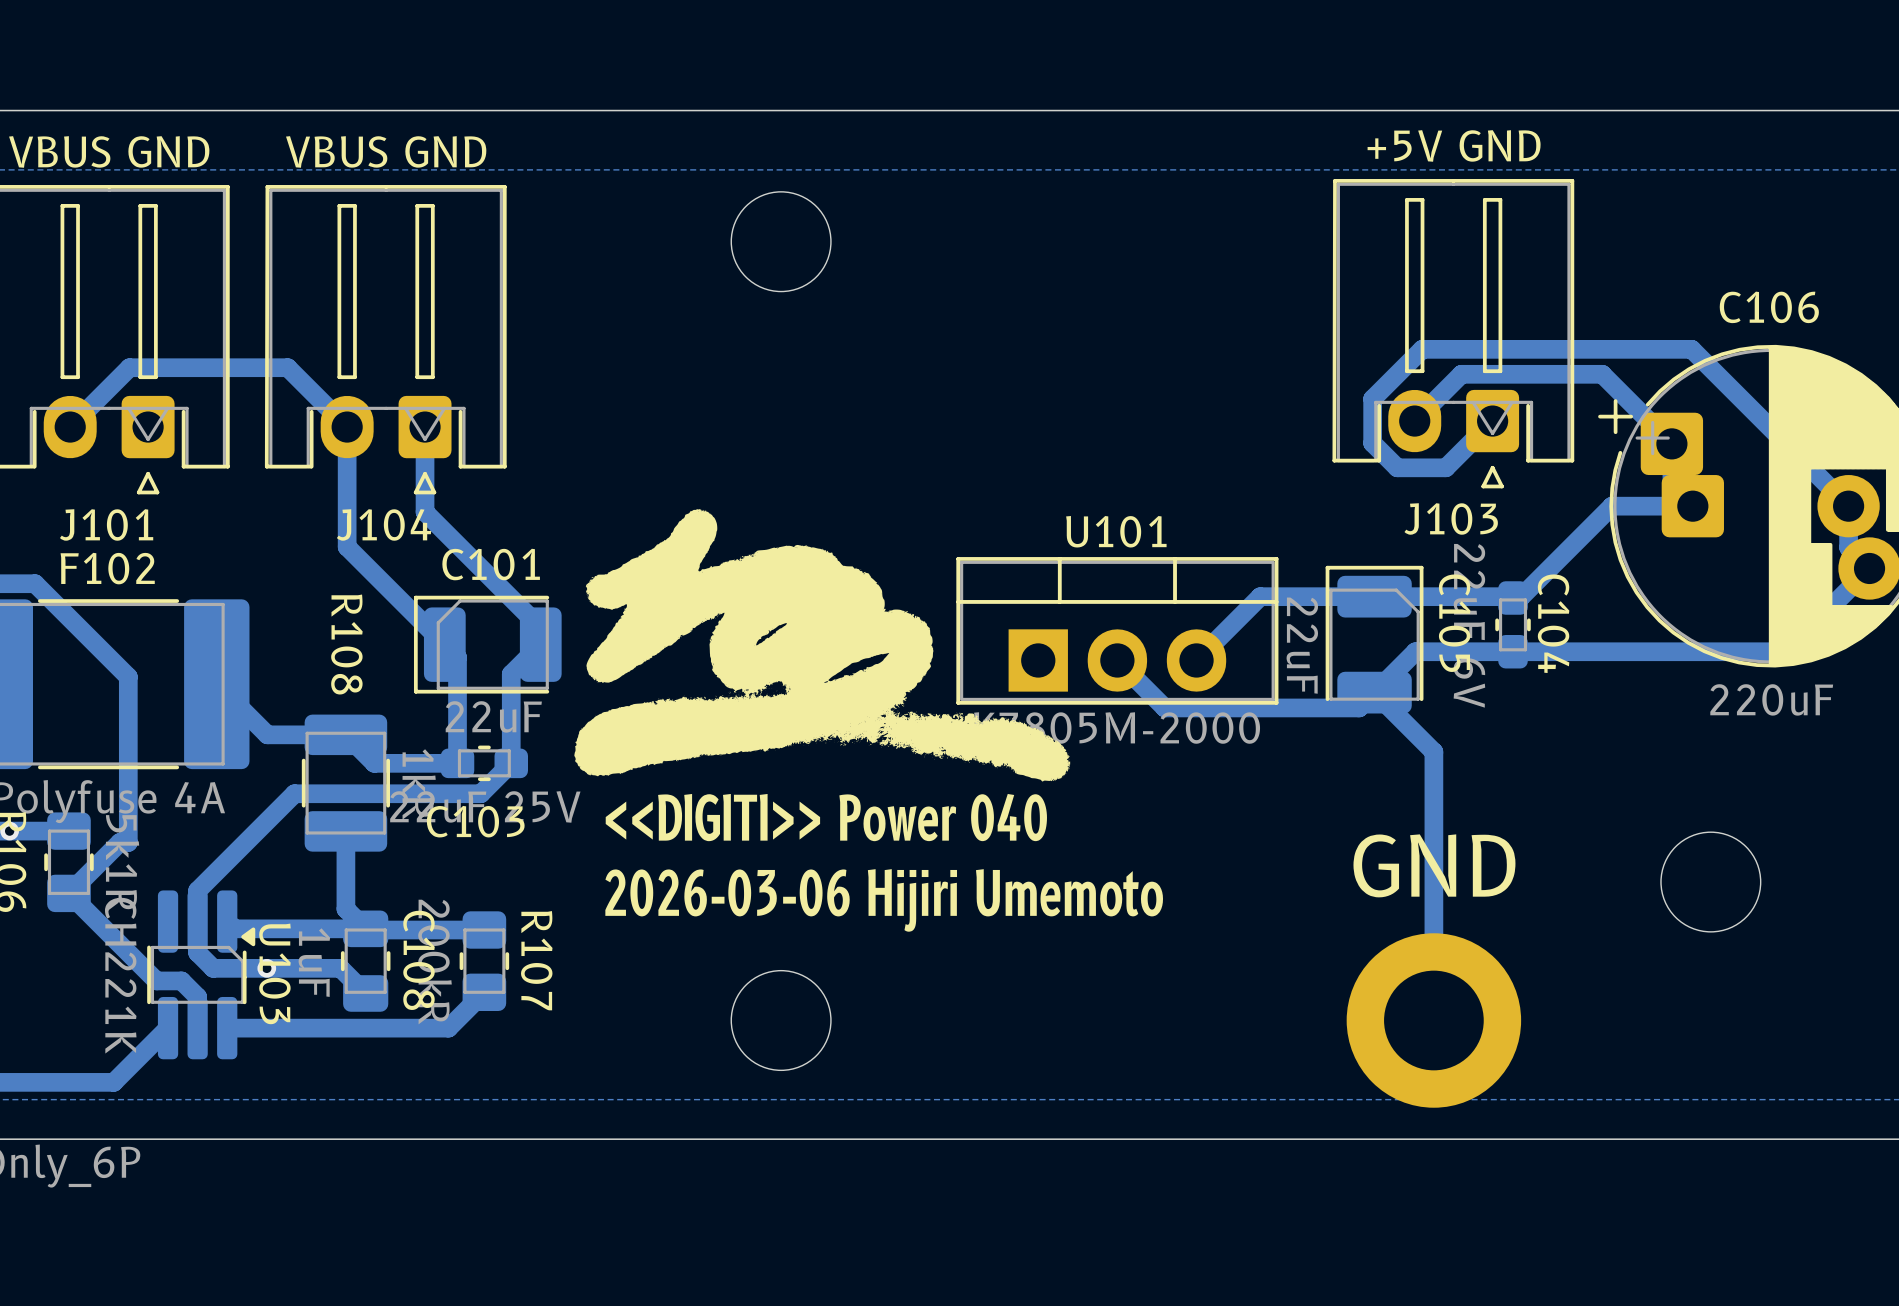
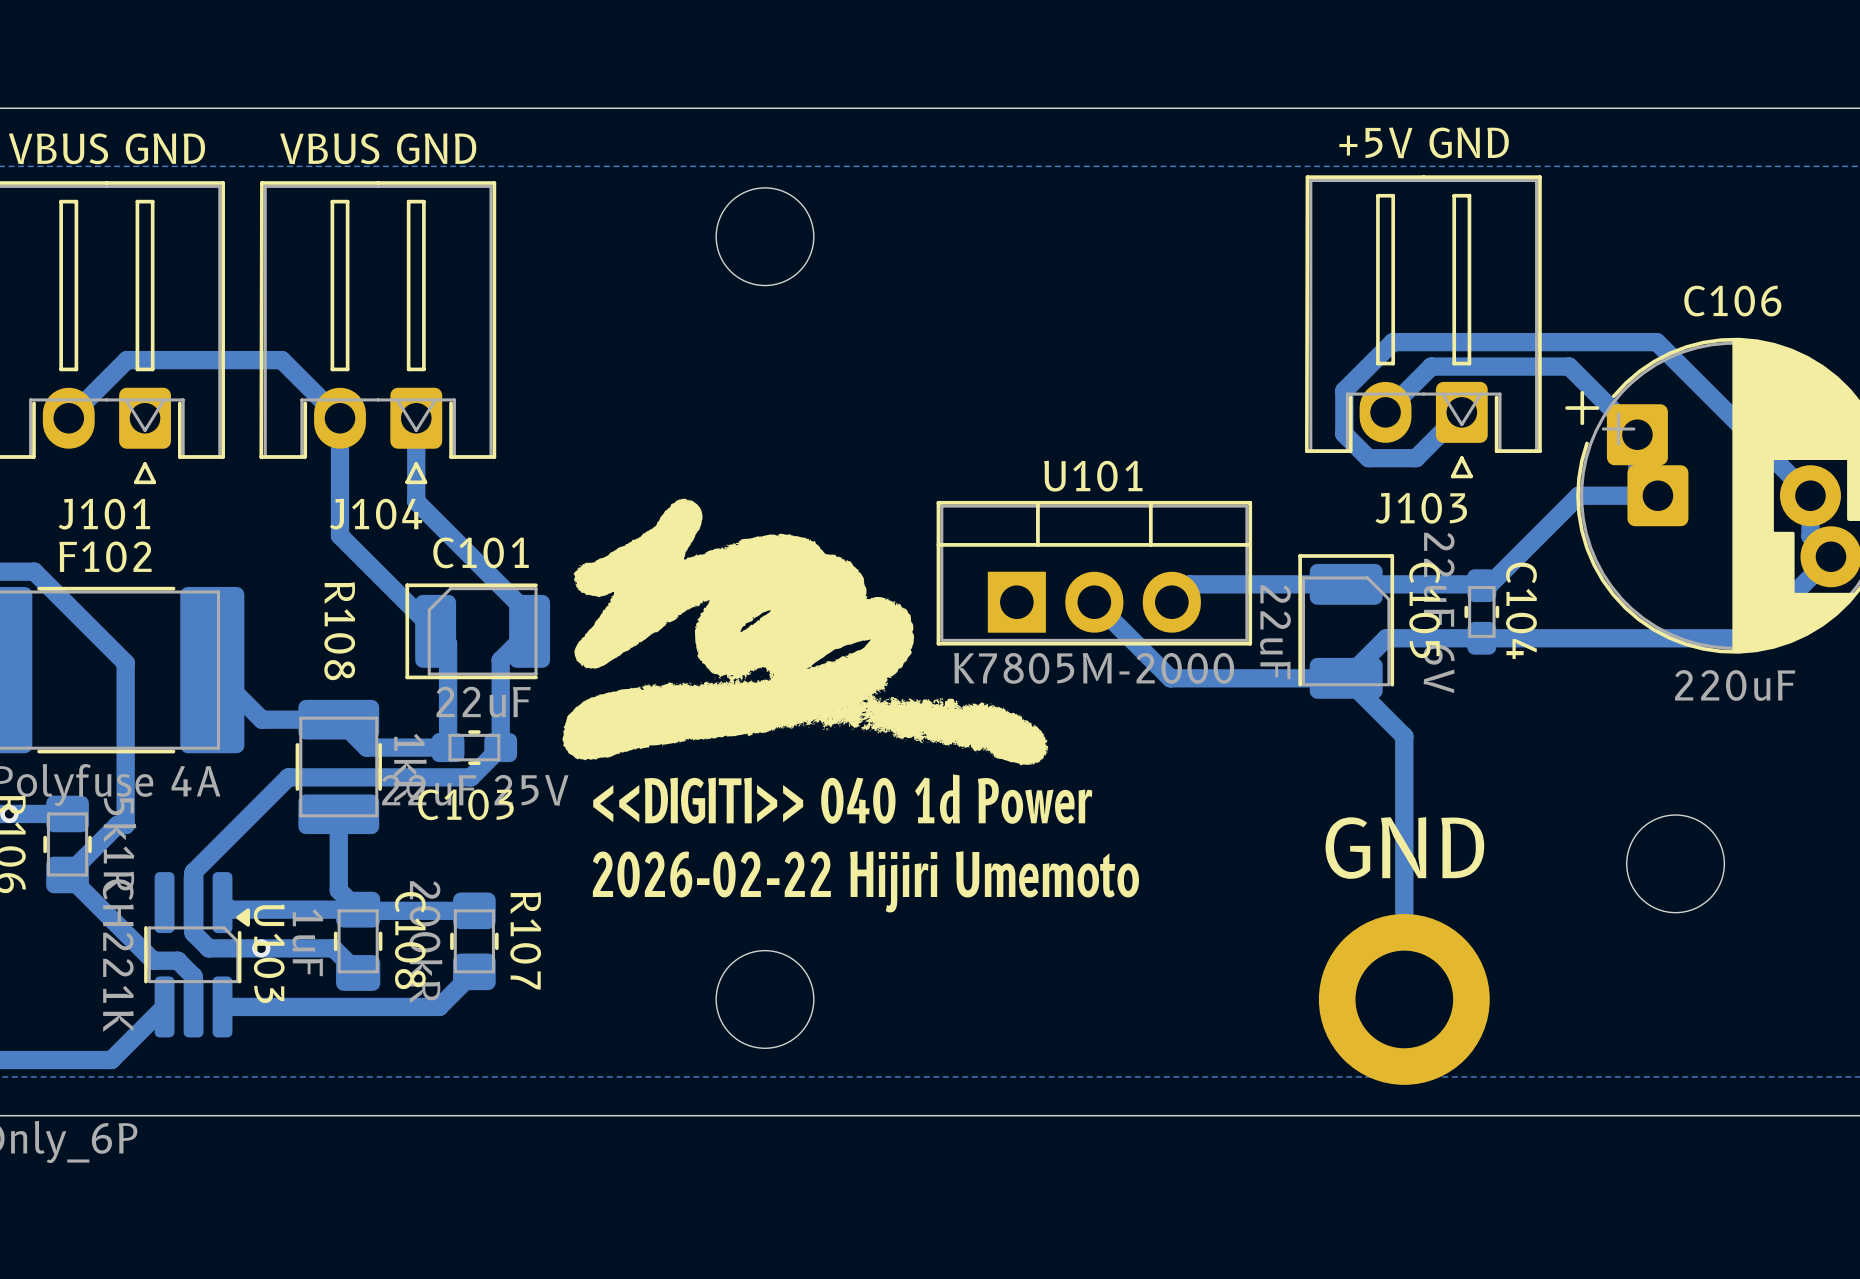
track: (1260, 596) (1196, 660) -> (1234, 584) (1189, 584) (1171, 602)
U101 position: (1117, 630) -> (1094, 573)
track: (1117, 660) (1164, 707) (1359, 707) (1374, 692) -> (1094, 602) (1170, 678) (1346, 678)
text: <<DIGITI>> Power 040 (826, 817) -> <<DIGITI>> 040 1d Power (842, 799)
text: 2026-03-06 Hijiri Umemoto (884, 900) -> 2026-02-22 Hijiri Umemoto (865, 881)

